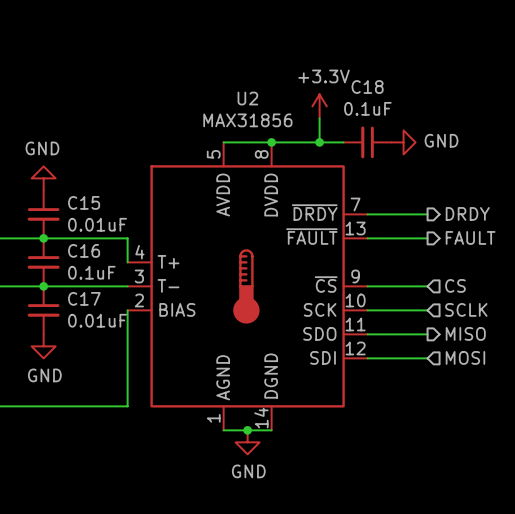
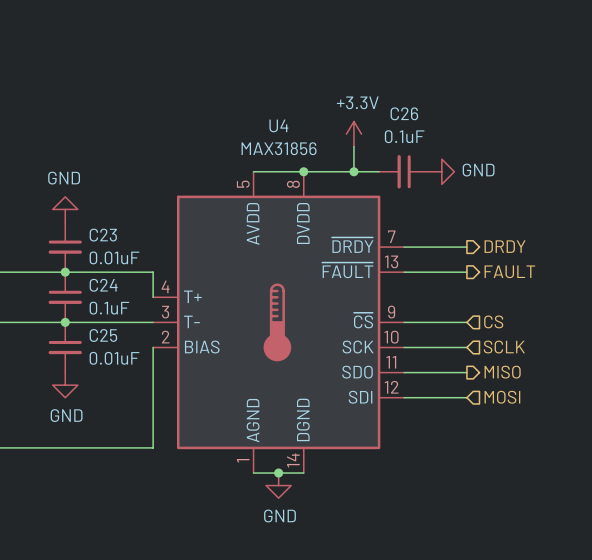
C18 name: C18 (367, 87) -> C26 (404, 113)
U2 name: U2 (247, 98) -> U4 (278, 125)
C15 name: C15 (84, 202) -> C23 (103, 235)
C16 name: C16 (84, 250) -> C24 (103, 285)
C17 name: C17 (84, 298) -> C25 (103, 335)

